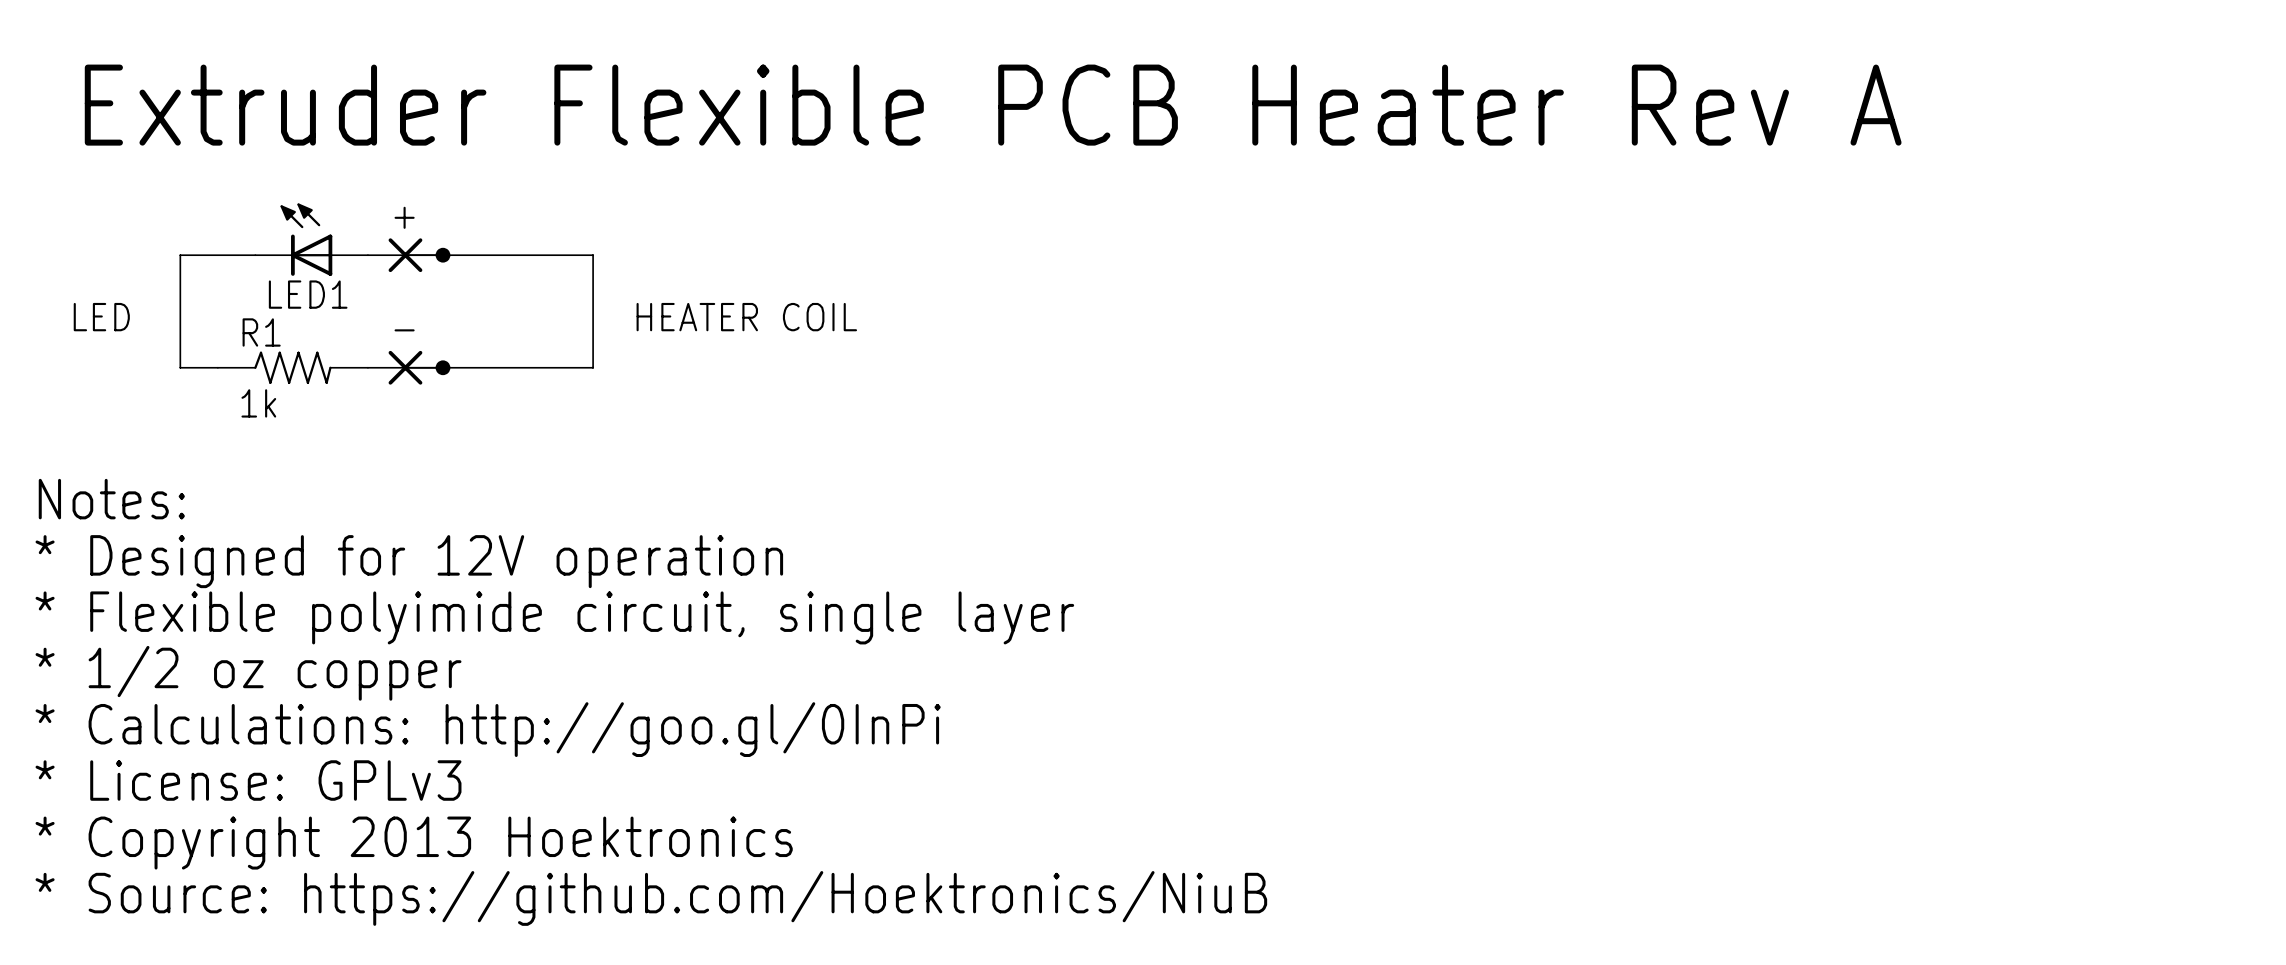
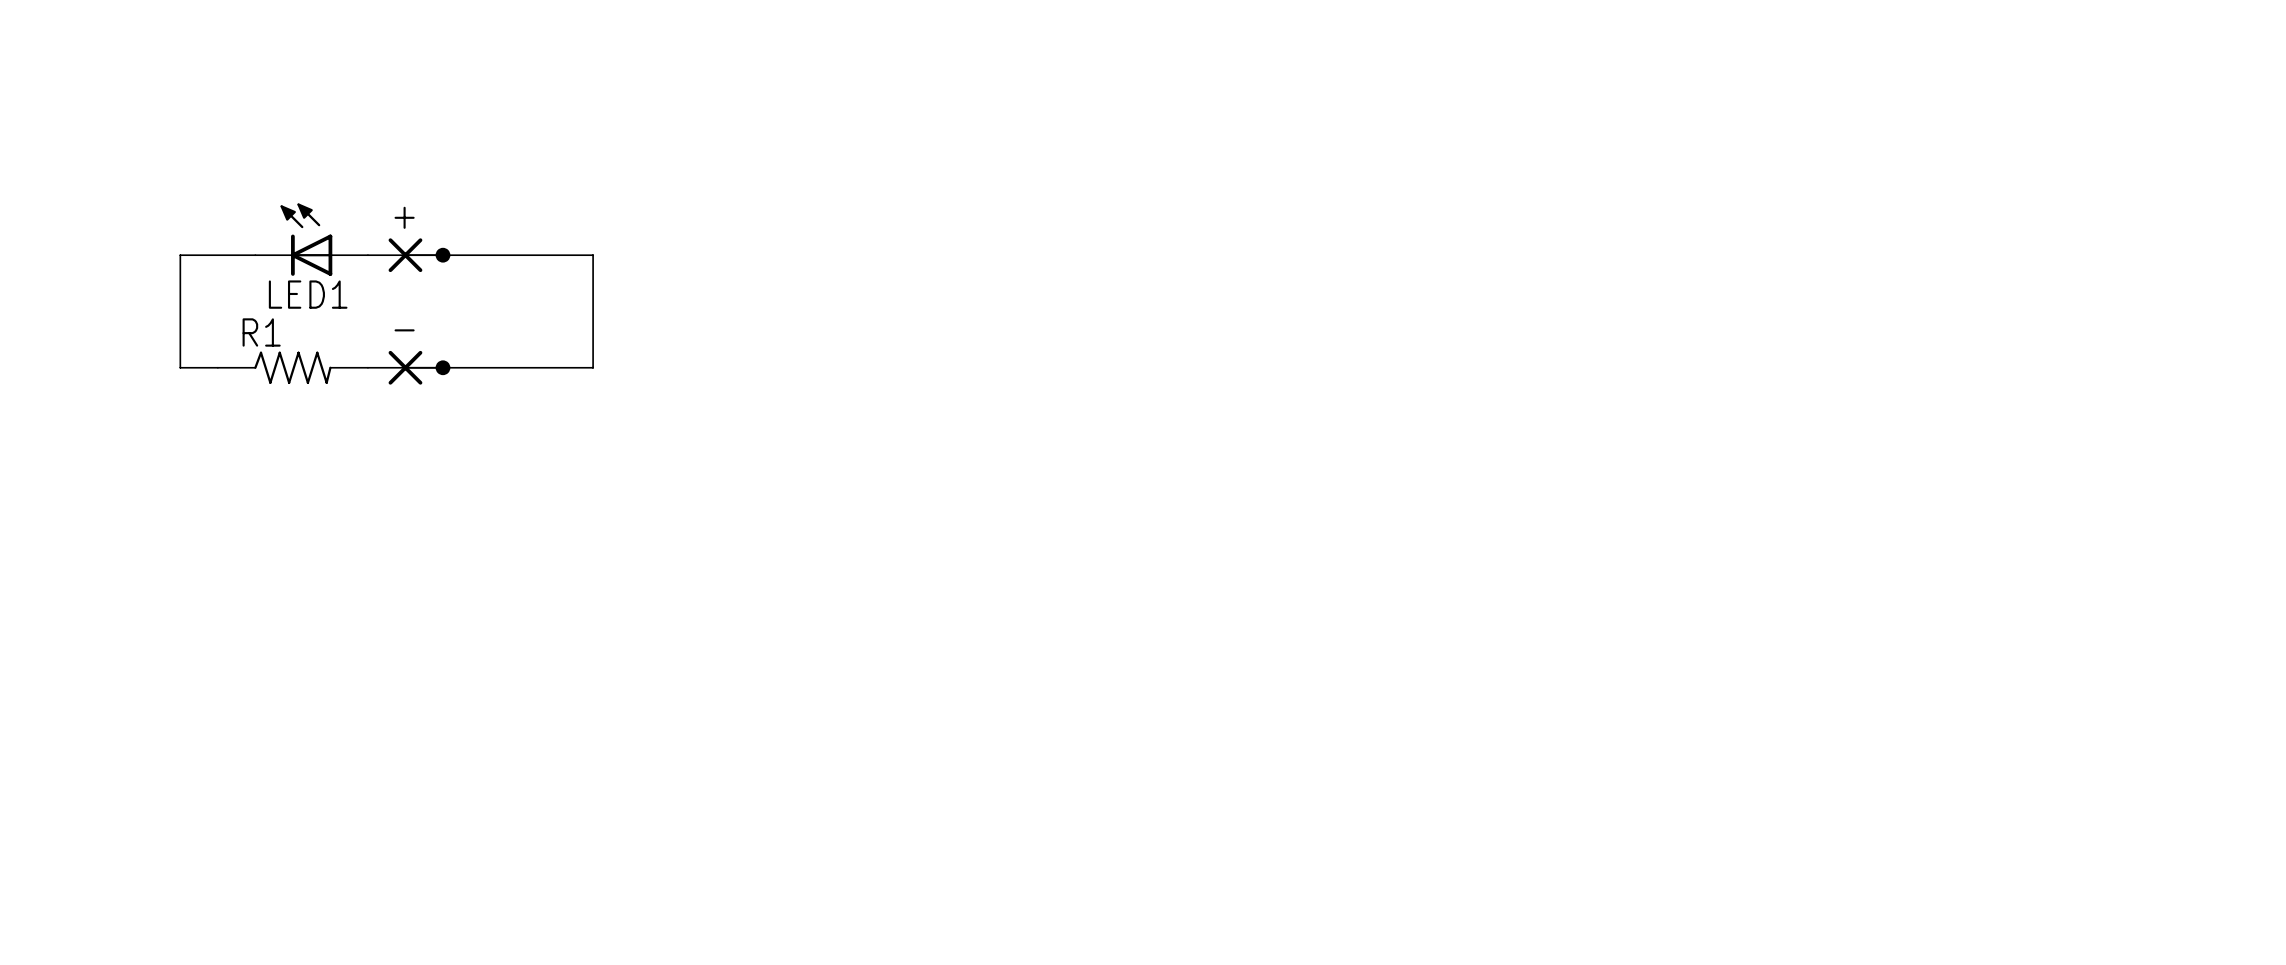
text: Extruder Flexible PCB Heater Rev A (993, 105) -> none
text: LED (101, 317) -> none
text: HEATER COIL (746, 317) -> none
R1 value: 1k (258, 403) -> none
text: Notes: (111, 499) -> none
text: * Designed for 12V operation (409, 561) -> none
text: * Flexible polyimide circuit, single layer (554, 617) -> none
text: * 1/2 oz copper (248, 673) -> none
text: * Calculations: http://goo.gl/0InPi (488, 729) -> none
text: * License: GPLv3 (248, 780) -> none
text: * Copyright 2013 Hoektronics (414, 843) -> none
text: * Source: https://github.com/Hoektronics/NiuB (651, 898) -> none

